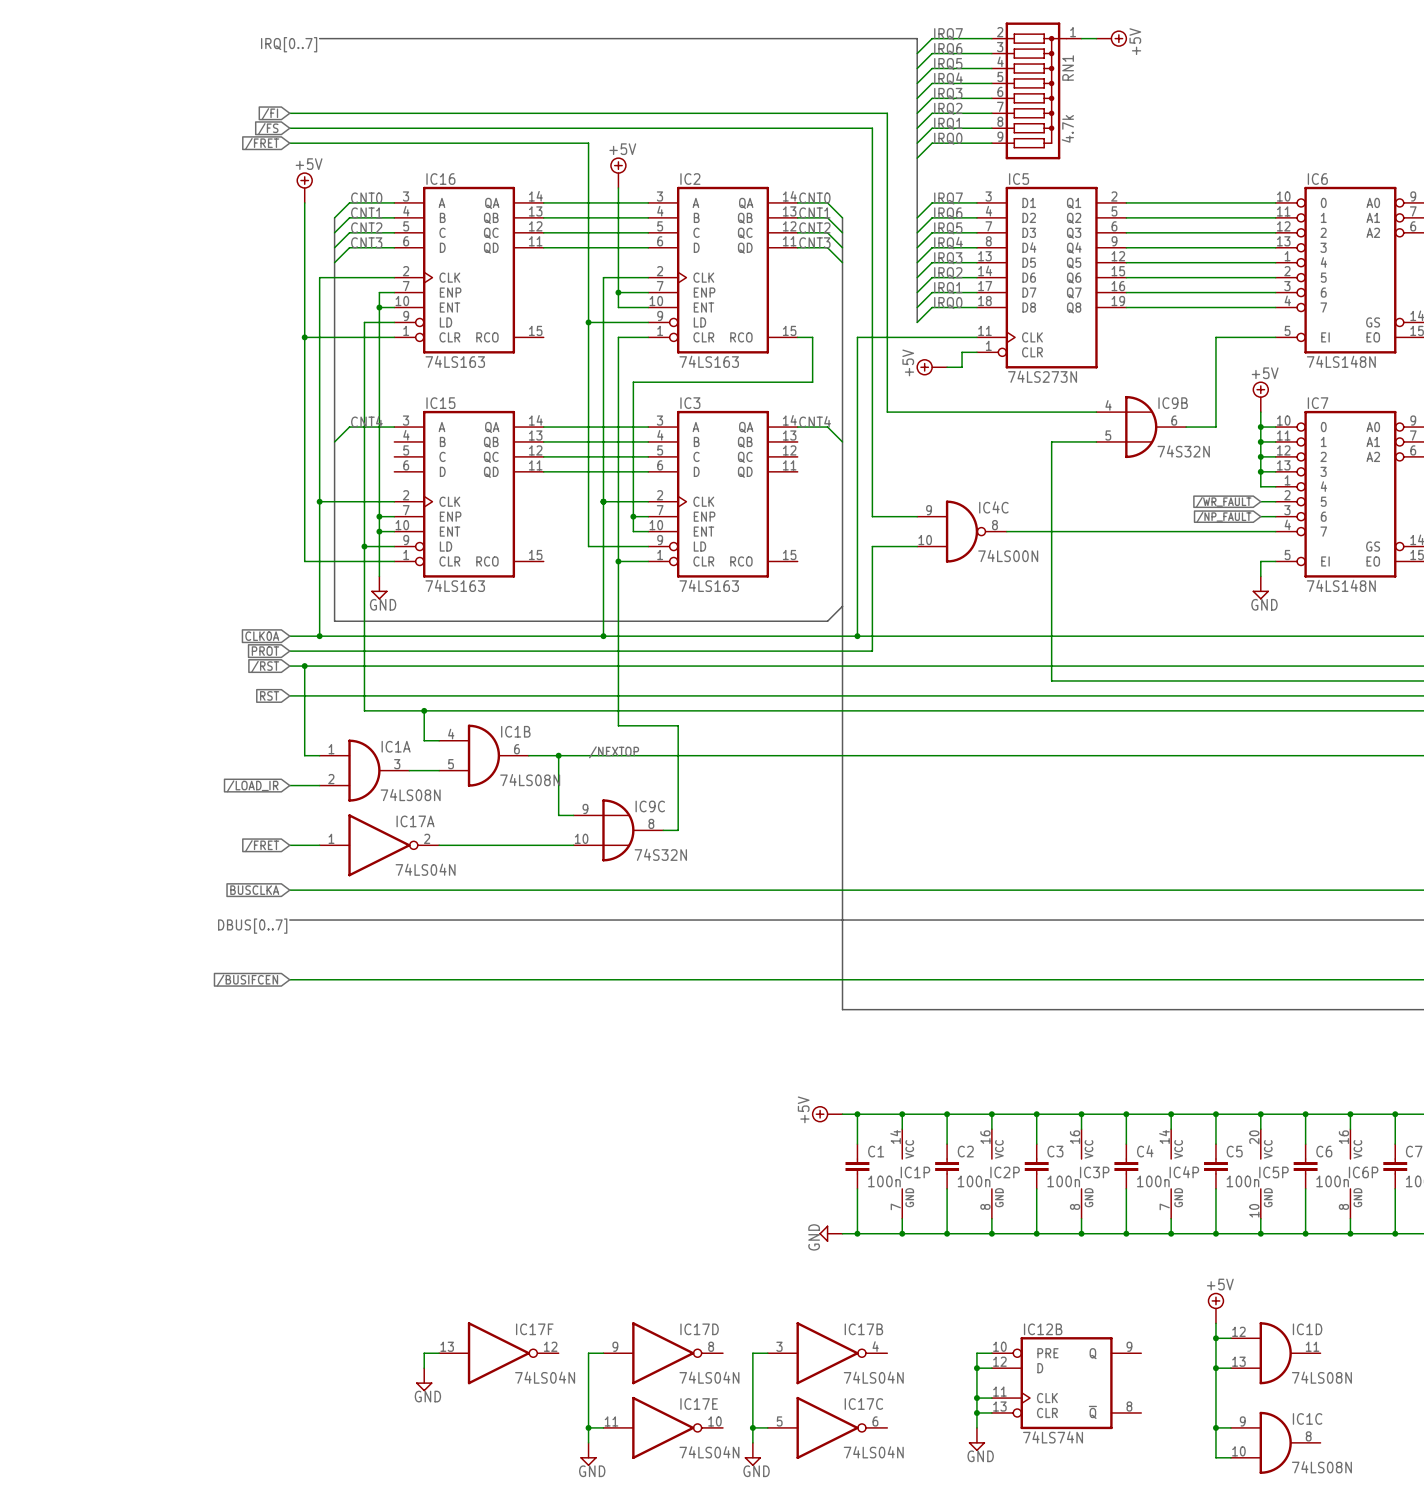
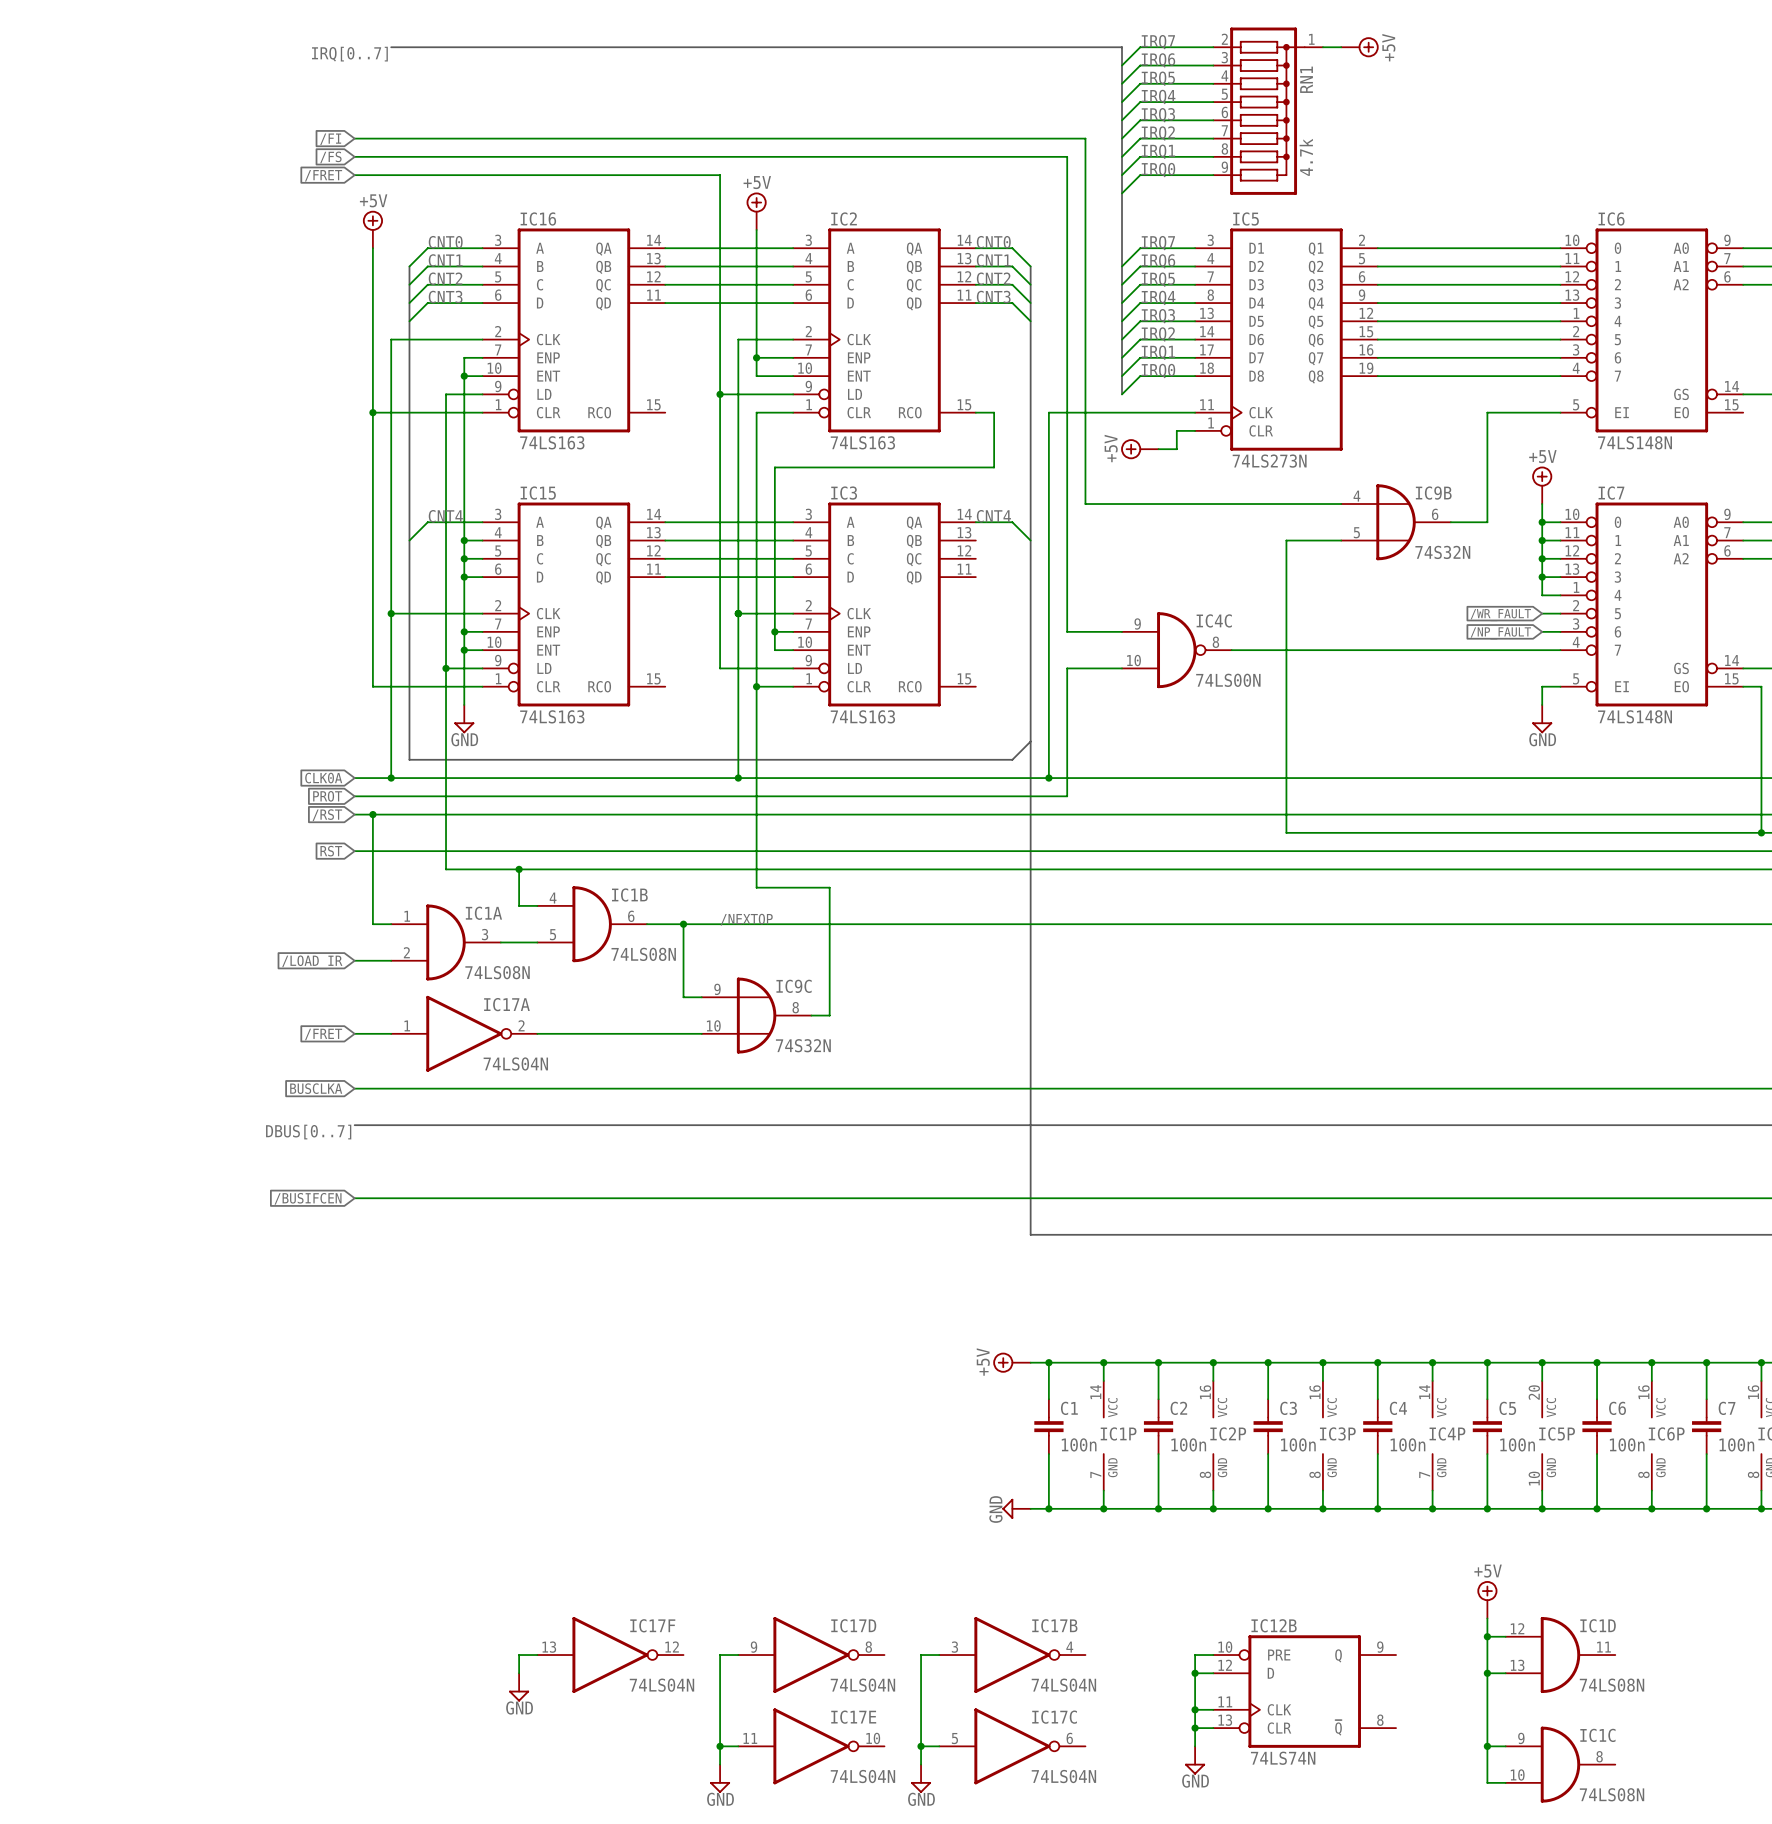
wire: none -> (464, 540) (482, 540)
junction: none -> (464, 540)
wire: none -> (464, 558) (482, 558)
junction: none -> (464, 558)
wire: none -> (464, 577) (482, 577)
junction: none -> (464, 577)

